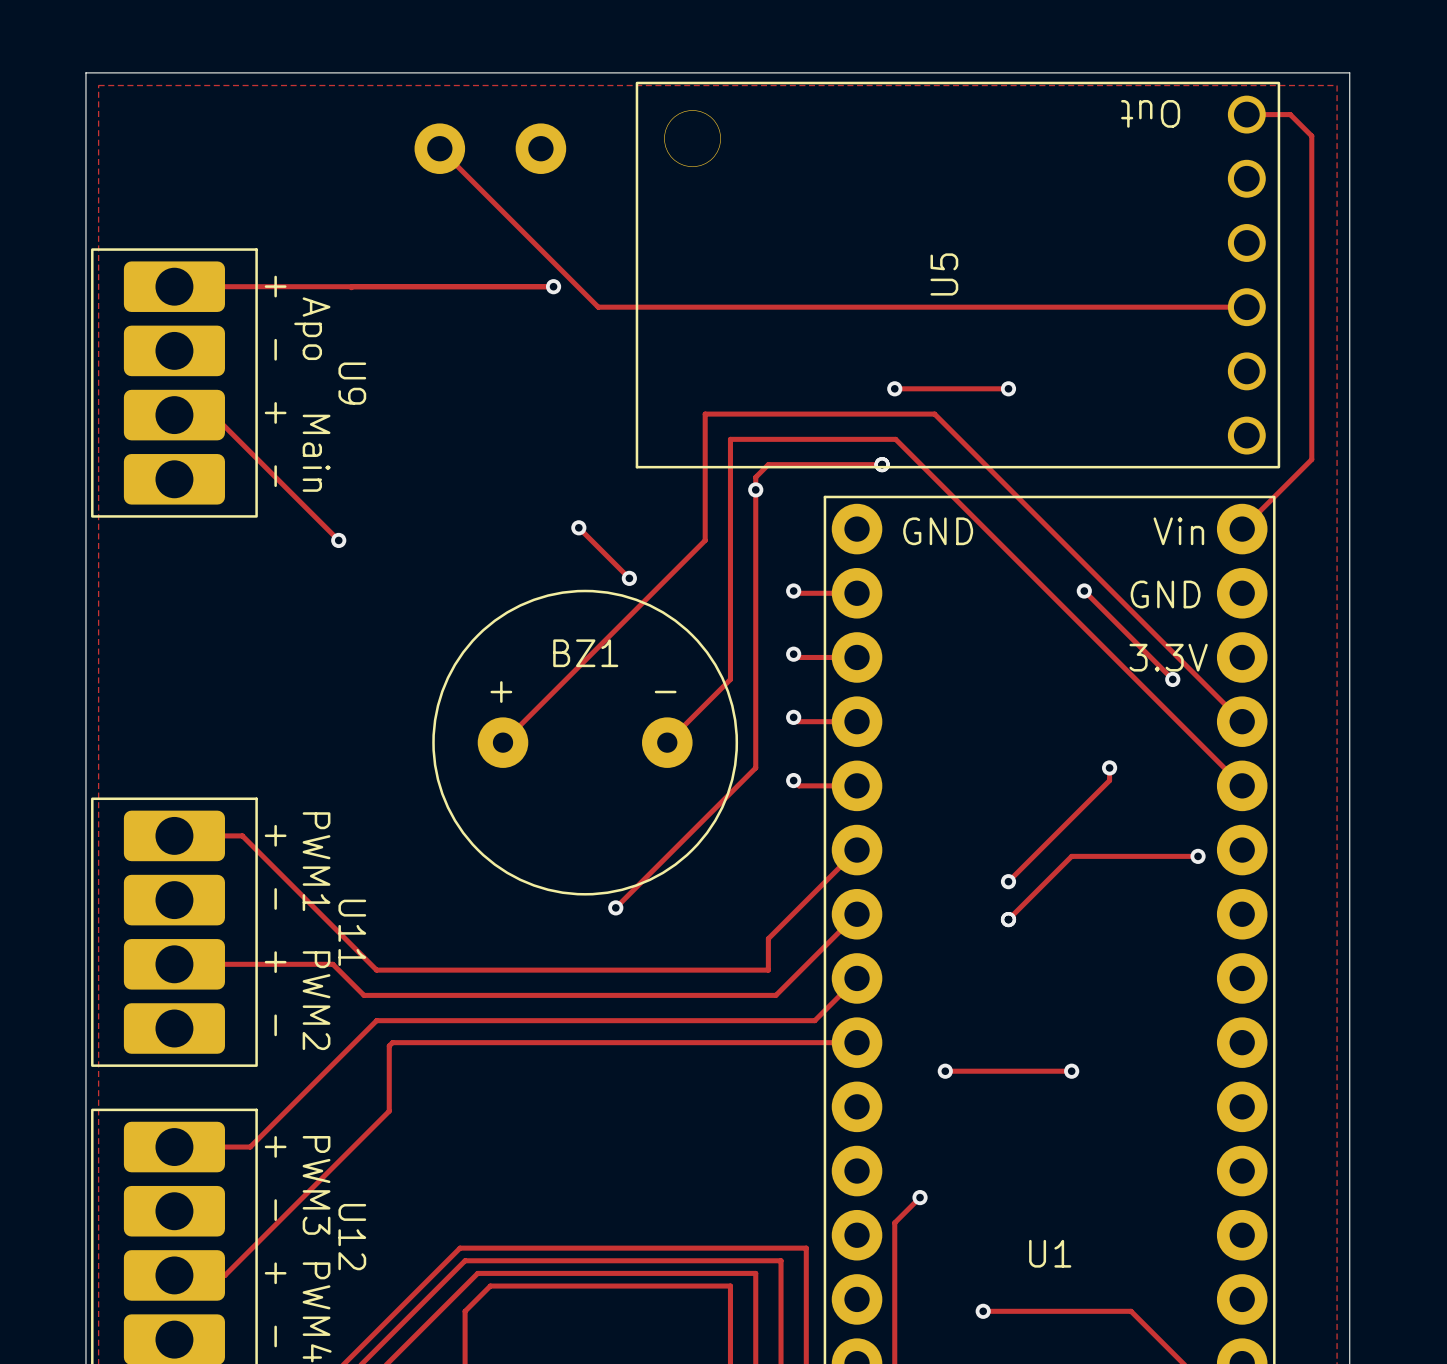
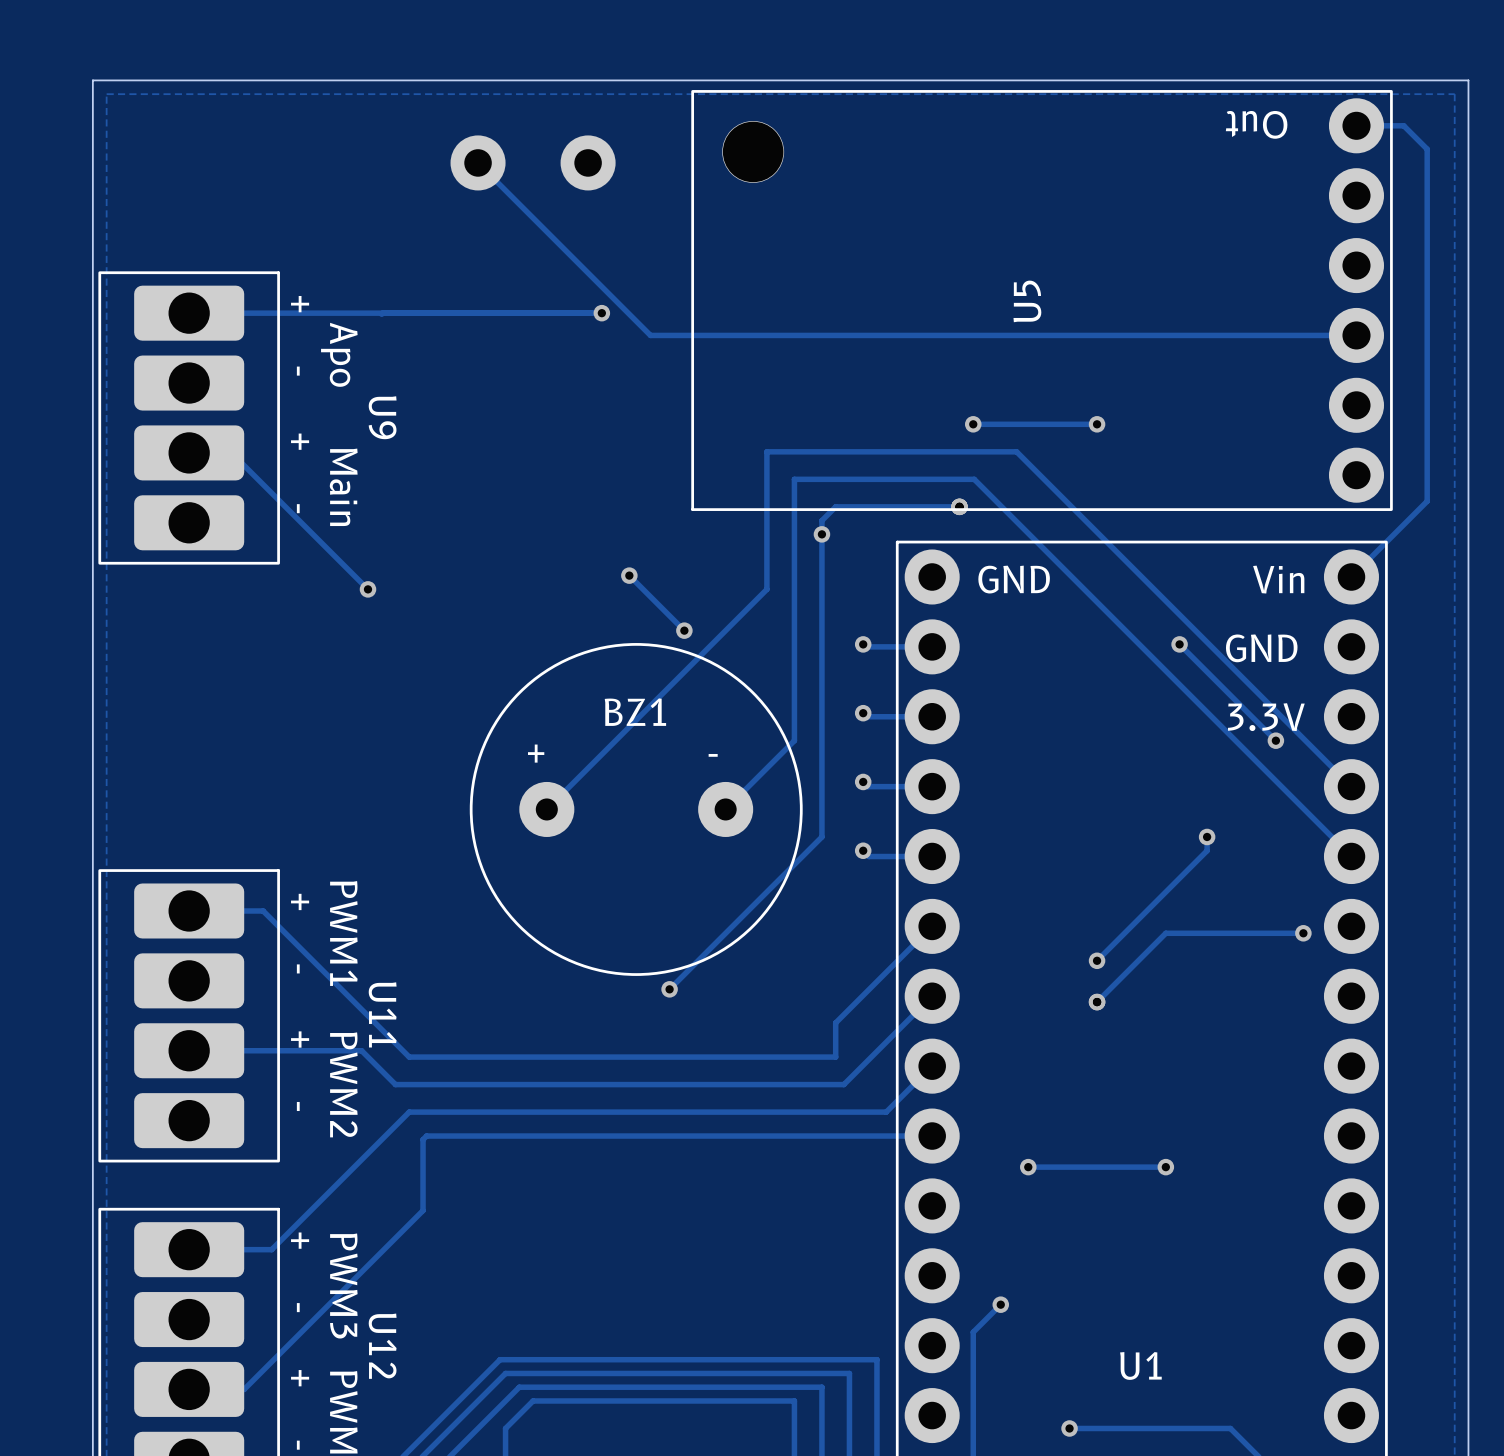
U5 footprint: [635, 81, 1281, 469] -> [691, 90, 1393, 511]

